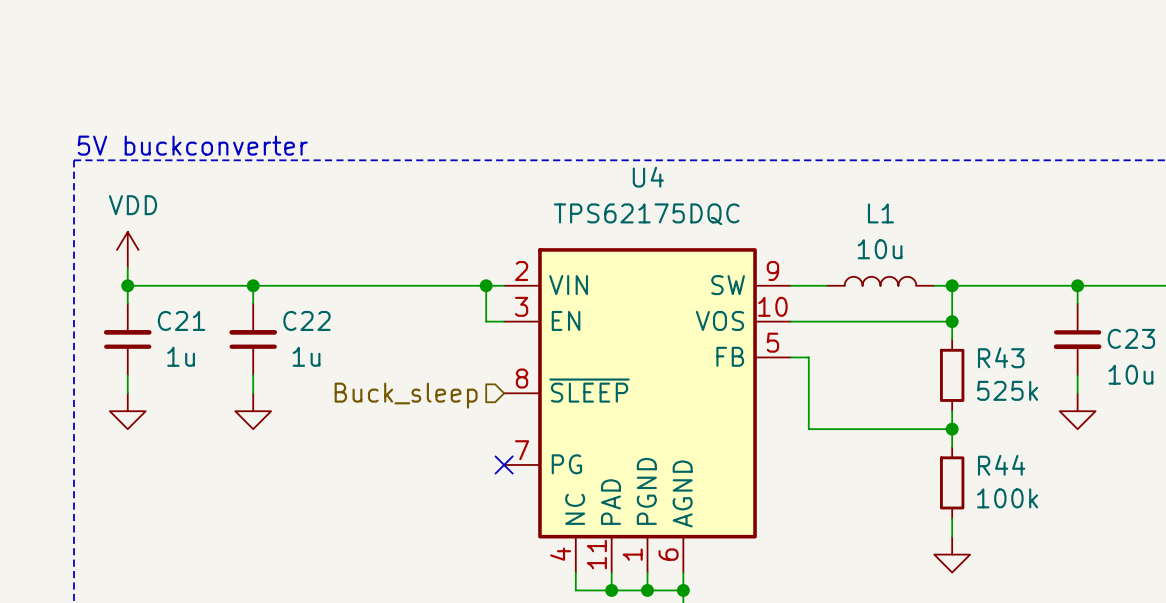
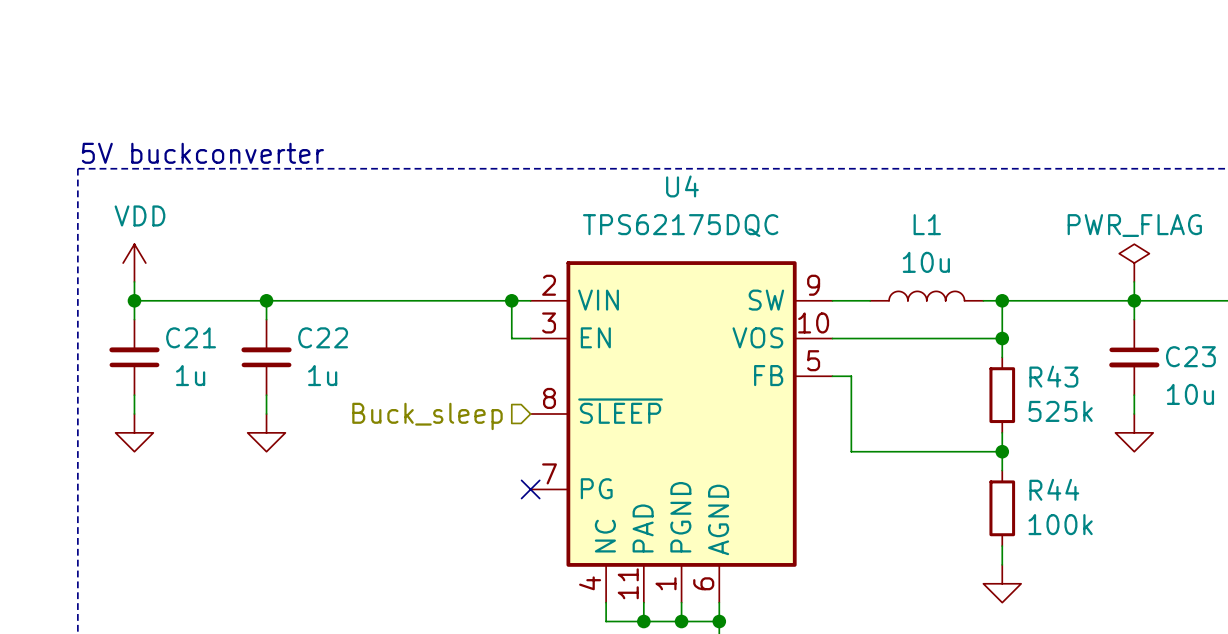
power symbol: none -> PWR_FLAG (1134, 263)
wire: none -> (1134, 281) (1134, 300)

